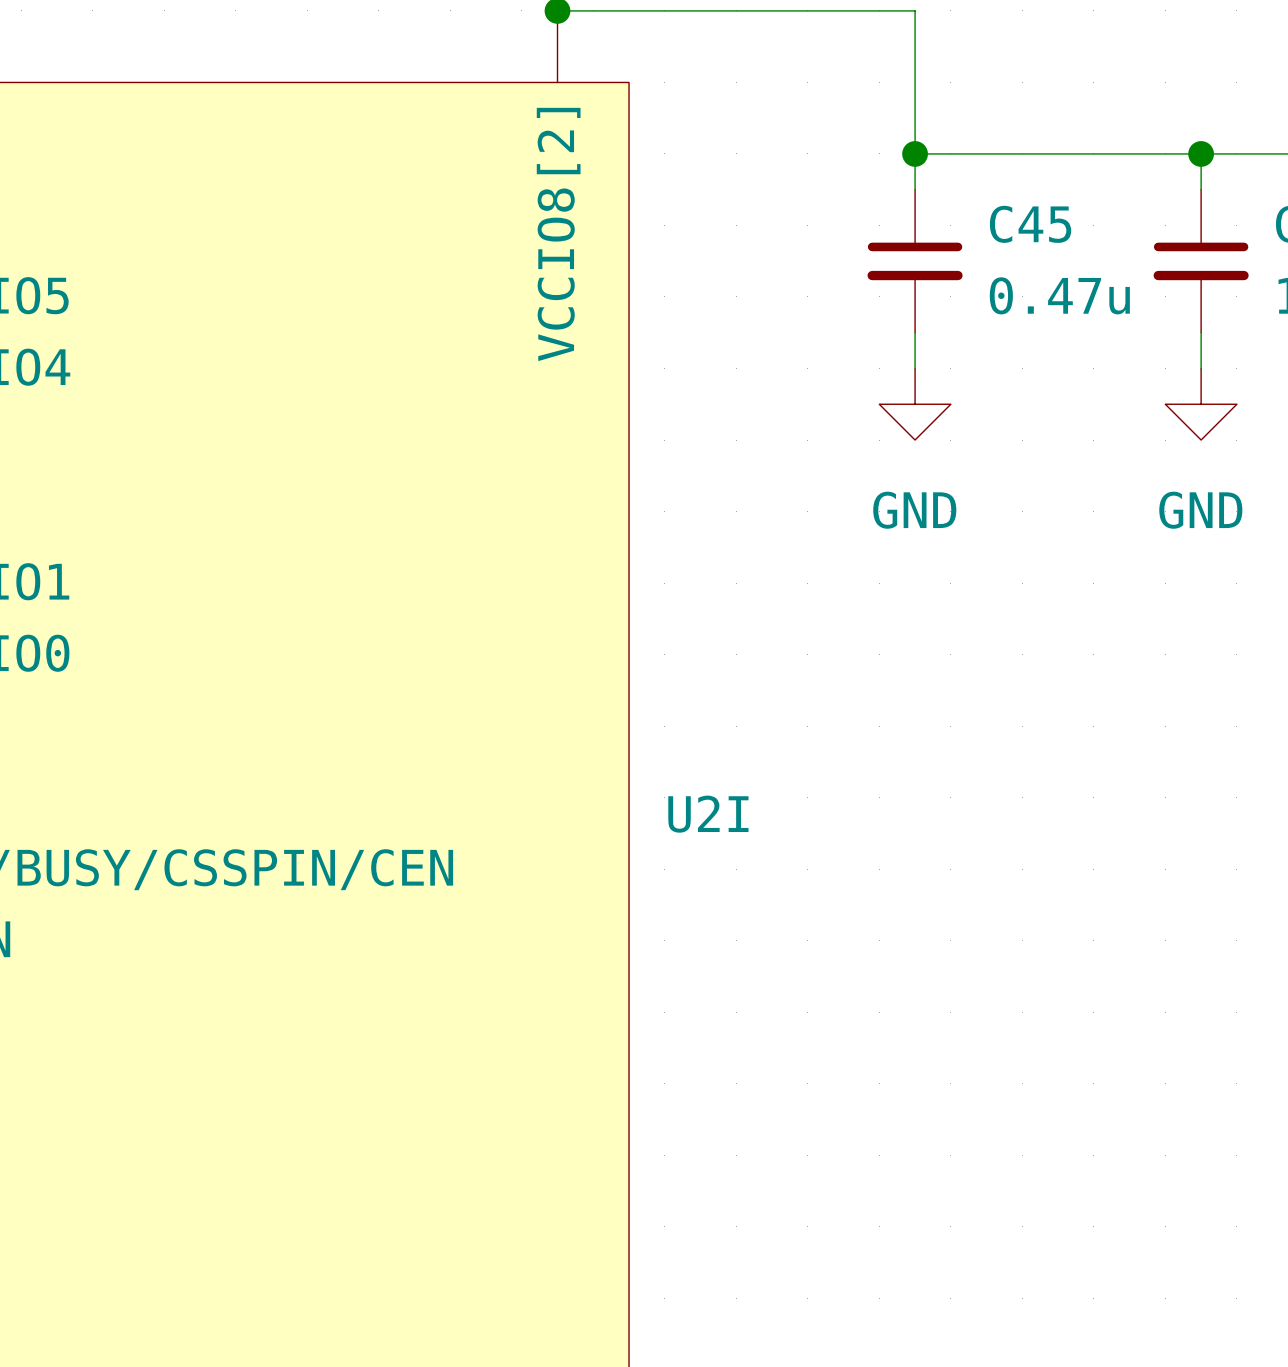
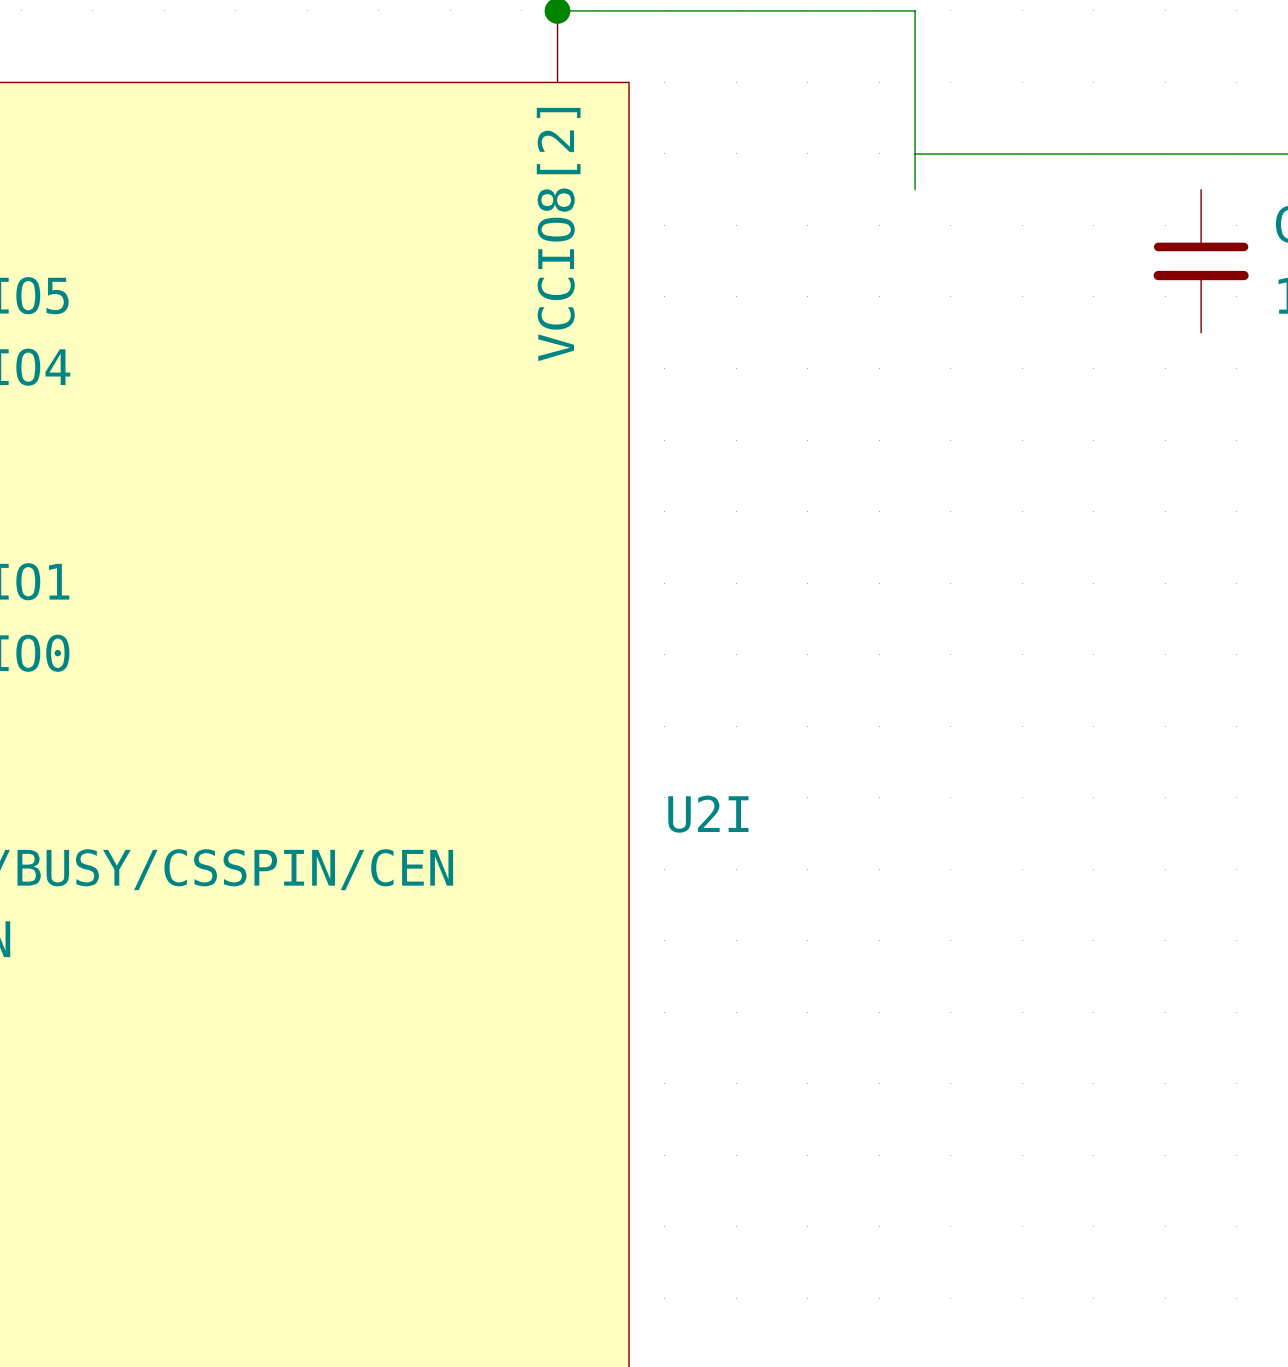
junction: (915, 153) -> none
wire: (1201, 153) (1201, 189) -> none
junction: (1201, 153) -> none
C45: 0.47u (915, 261) -> none
wire: (915, 332) (915, 368) -> none
wire: (1201, 332) (1201, 368) -> none
power symbol: GND (915, 404) -> none
power symbol: GND (1201, 404) -> none

